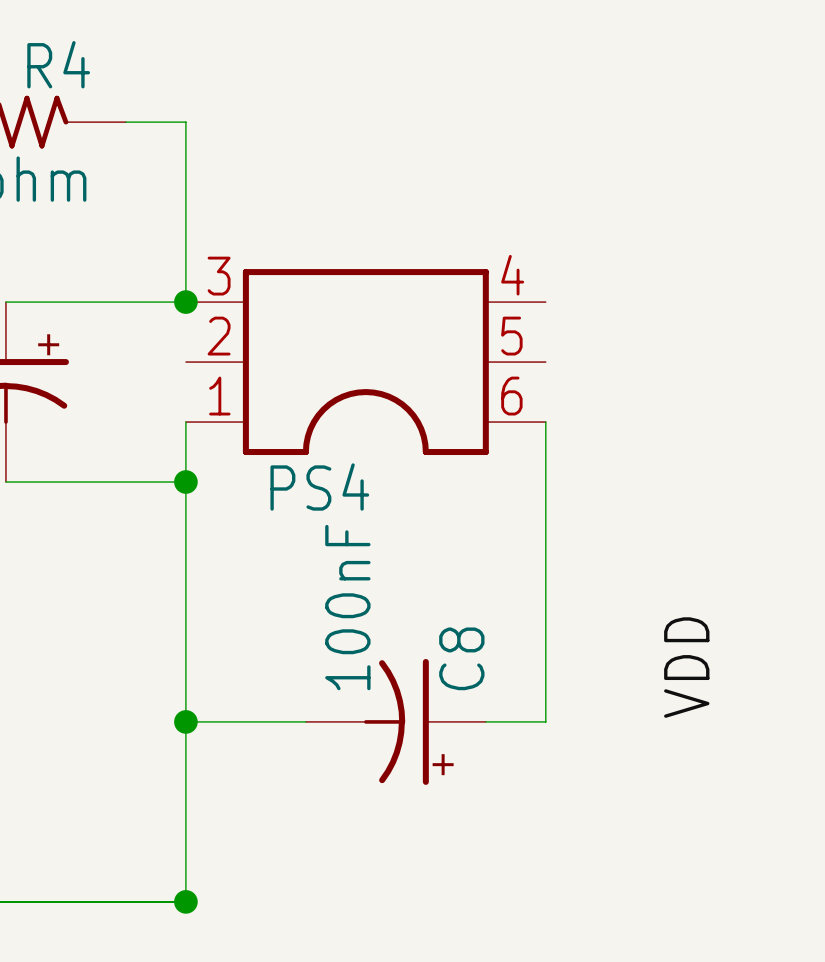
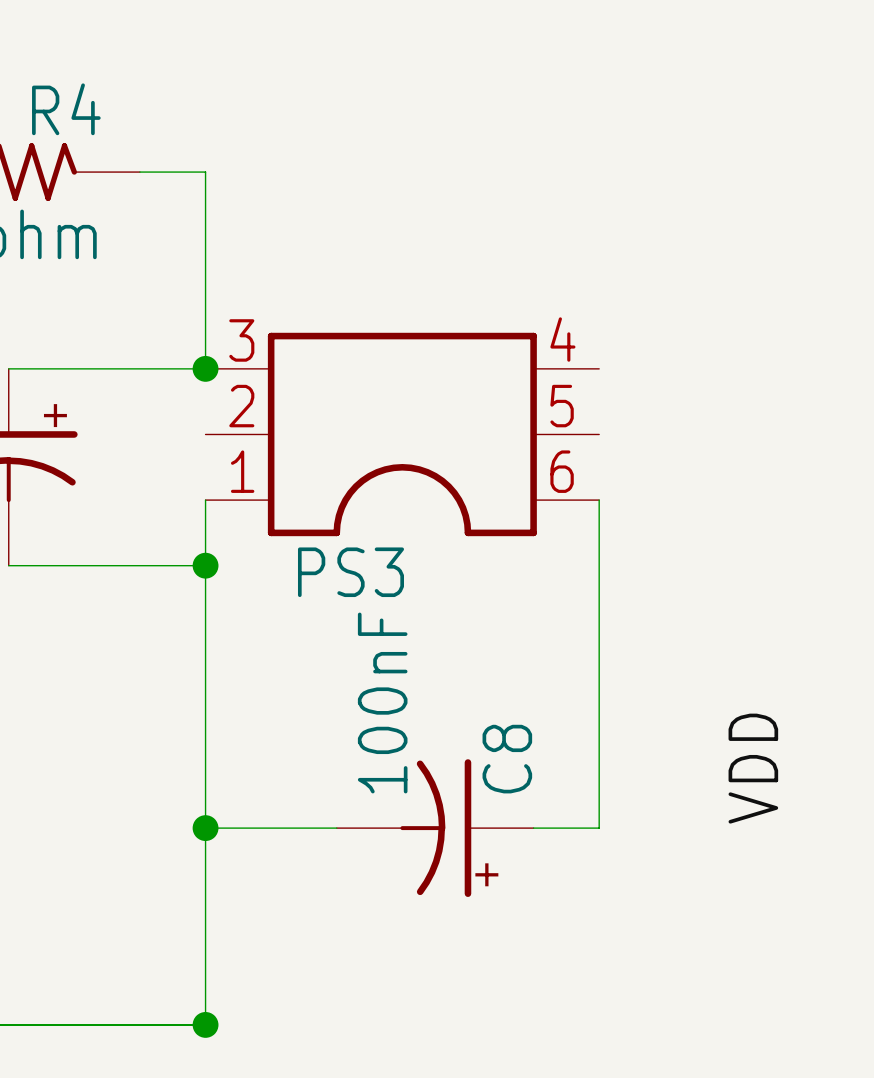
PS4 name: PS4 (319, 487) -> PS3 (350, 572)

